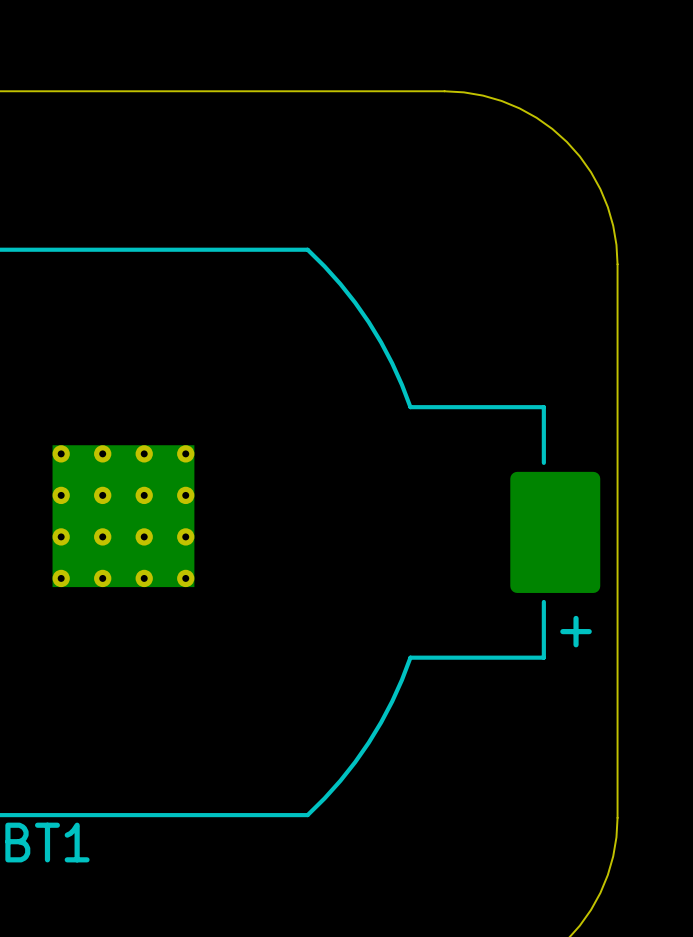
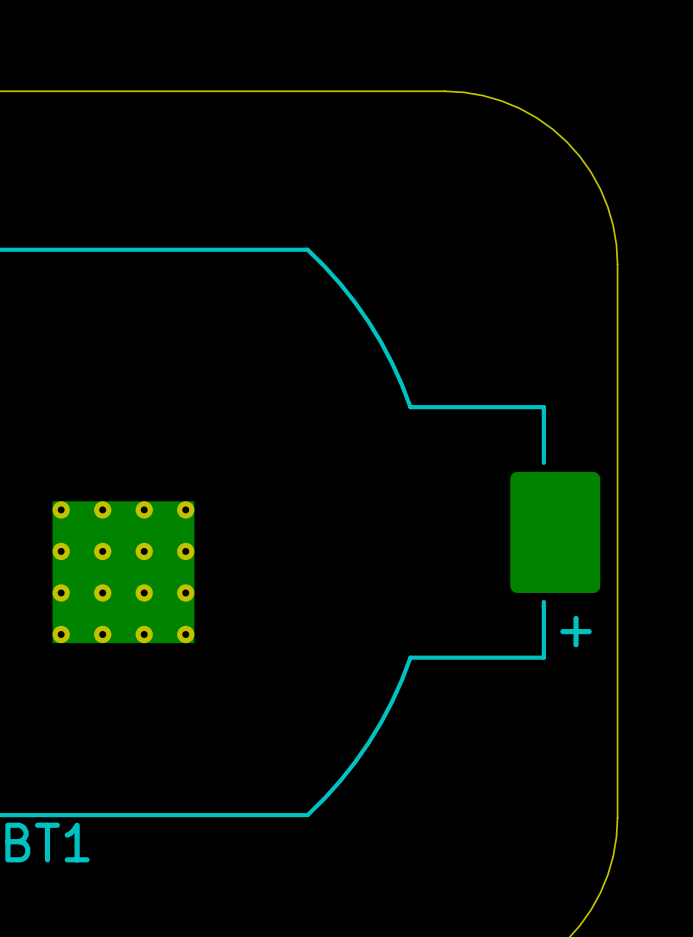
part position: (123, 516) -> (123, 572)

